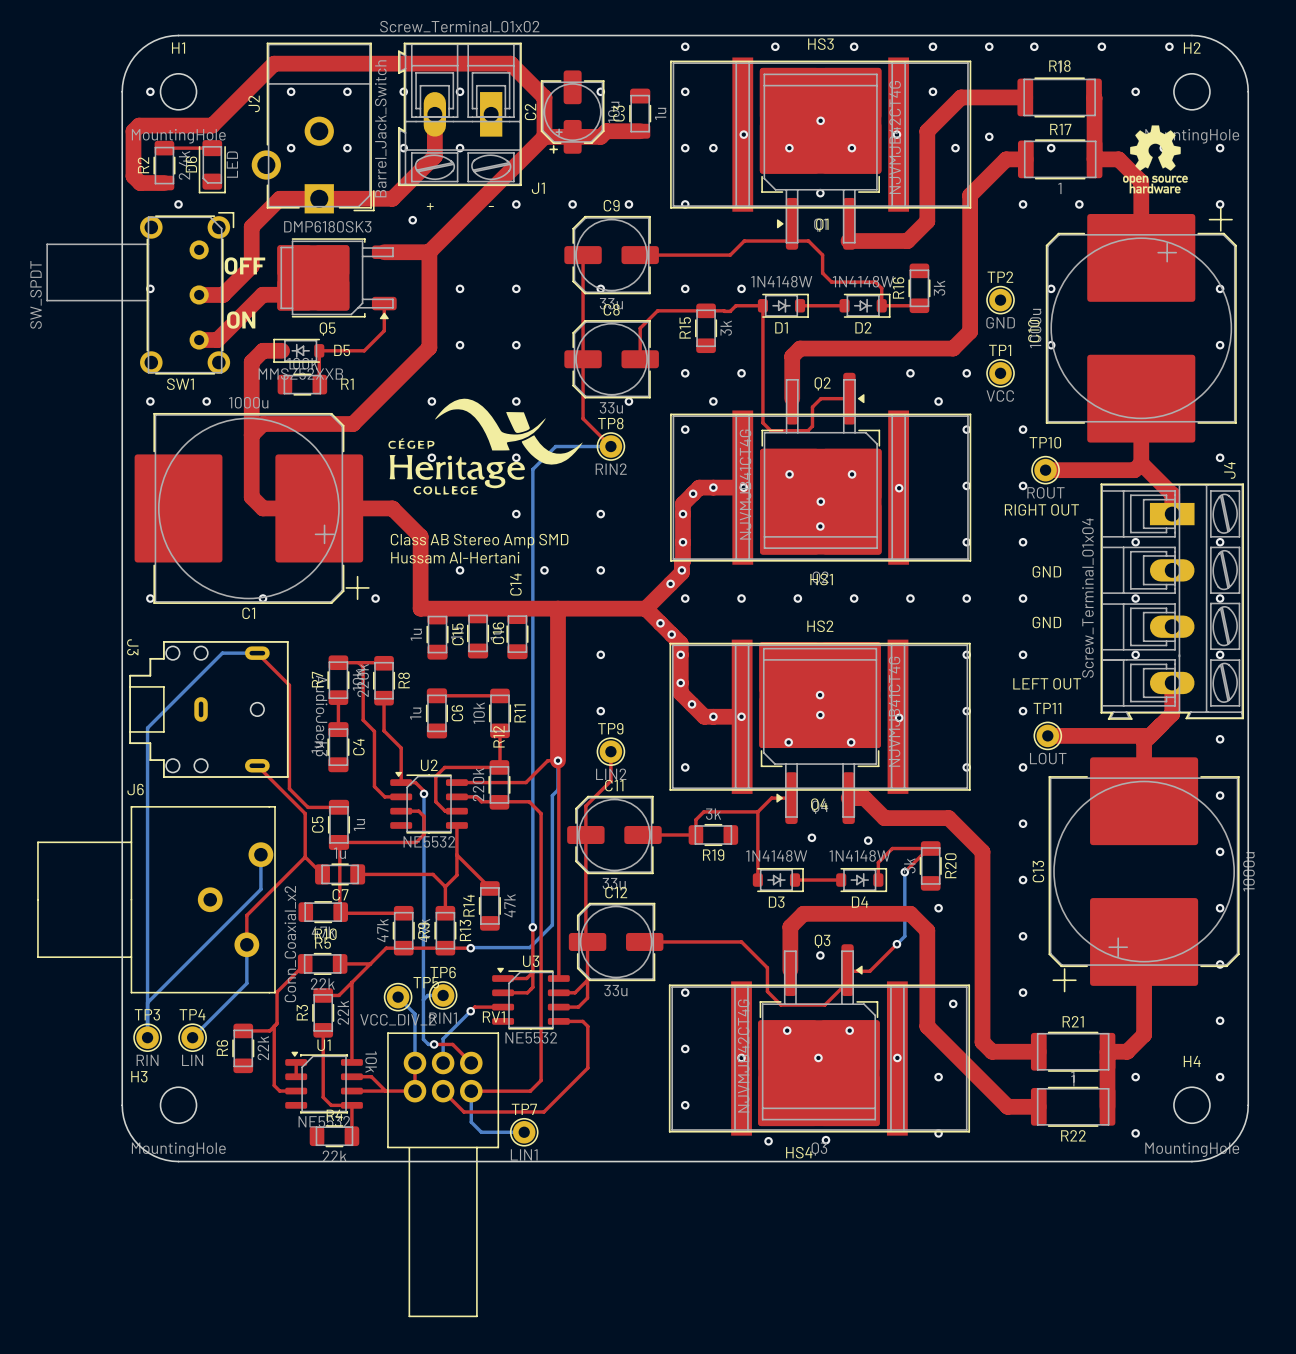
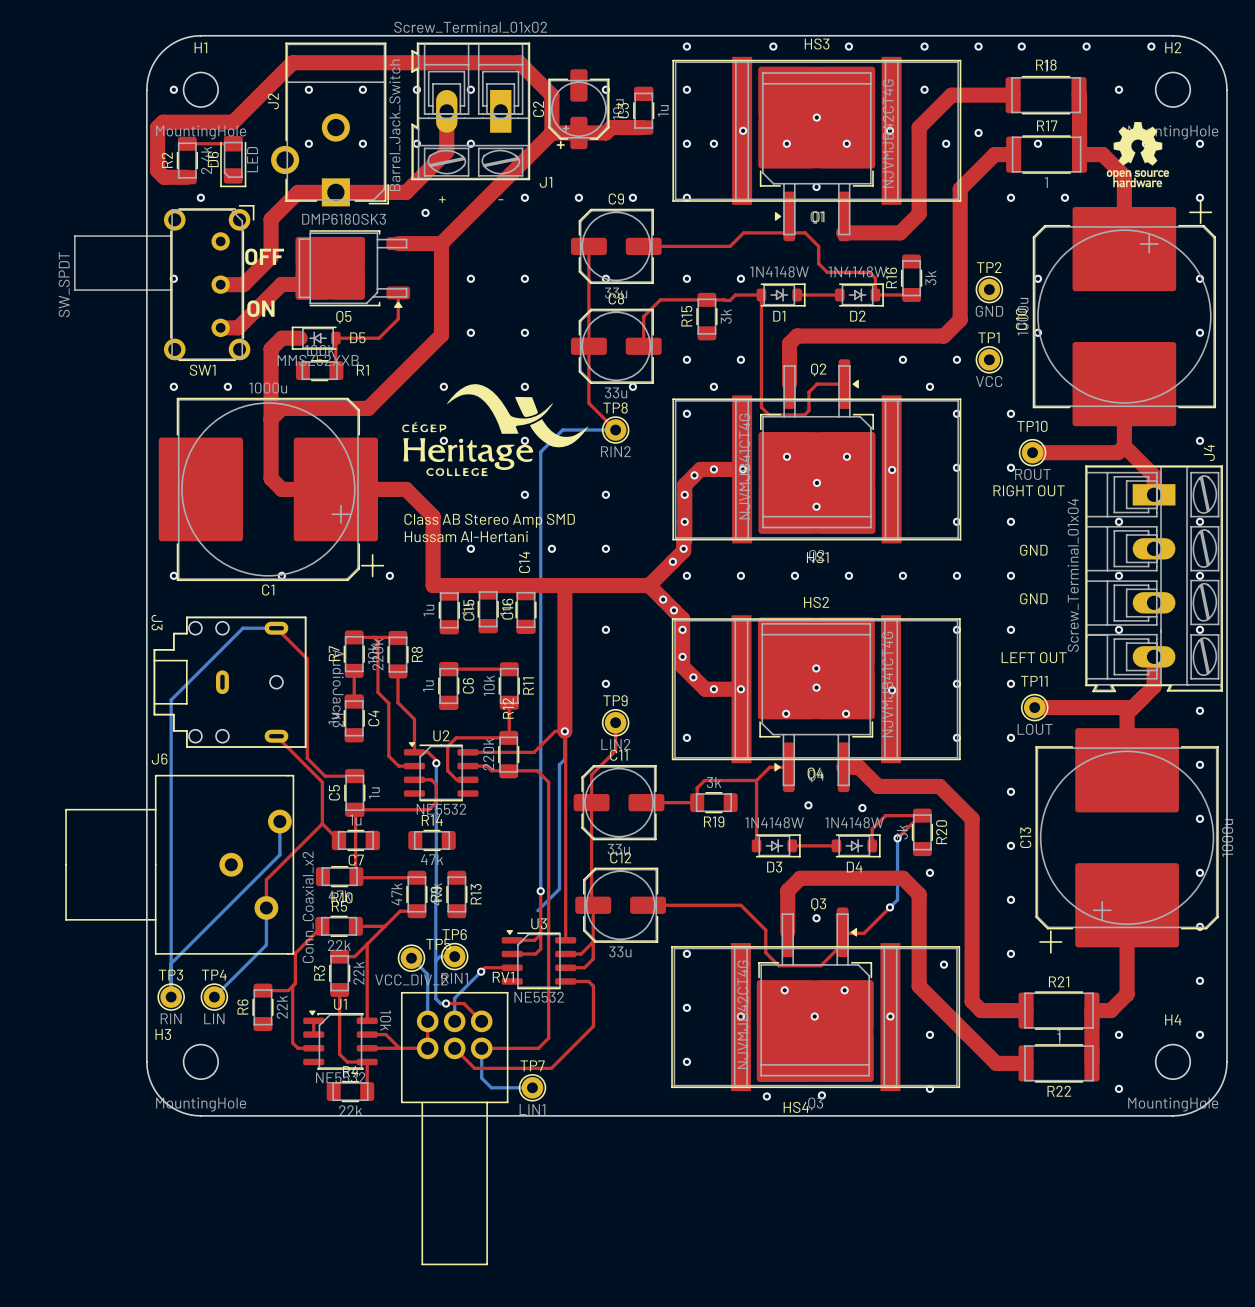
top track: (456, 825) (456, 875) (445, 886) -> none
top track: (456, 854) (489, 888) -> none
top track: (357, 874) (433, 874) (445, 886) -> none
top track: (445, 886) (445, 913) -> none
R14 rotation: 0° (489, 905) -> 90° clockwise (432, 840)
R14 position: (489, 905) -> (432, 840)
bottom track: (529, 947) (470, 948) -> none
top track: (403, 948) (470, 948) -> none
via: (470, 948) -> none

